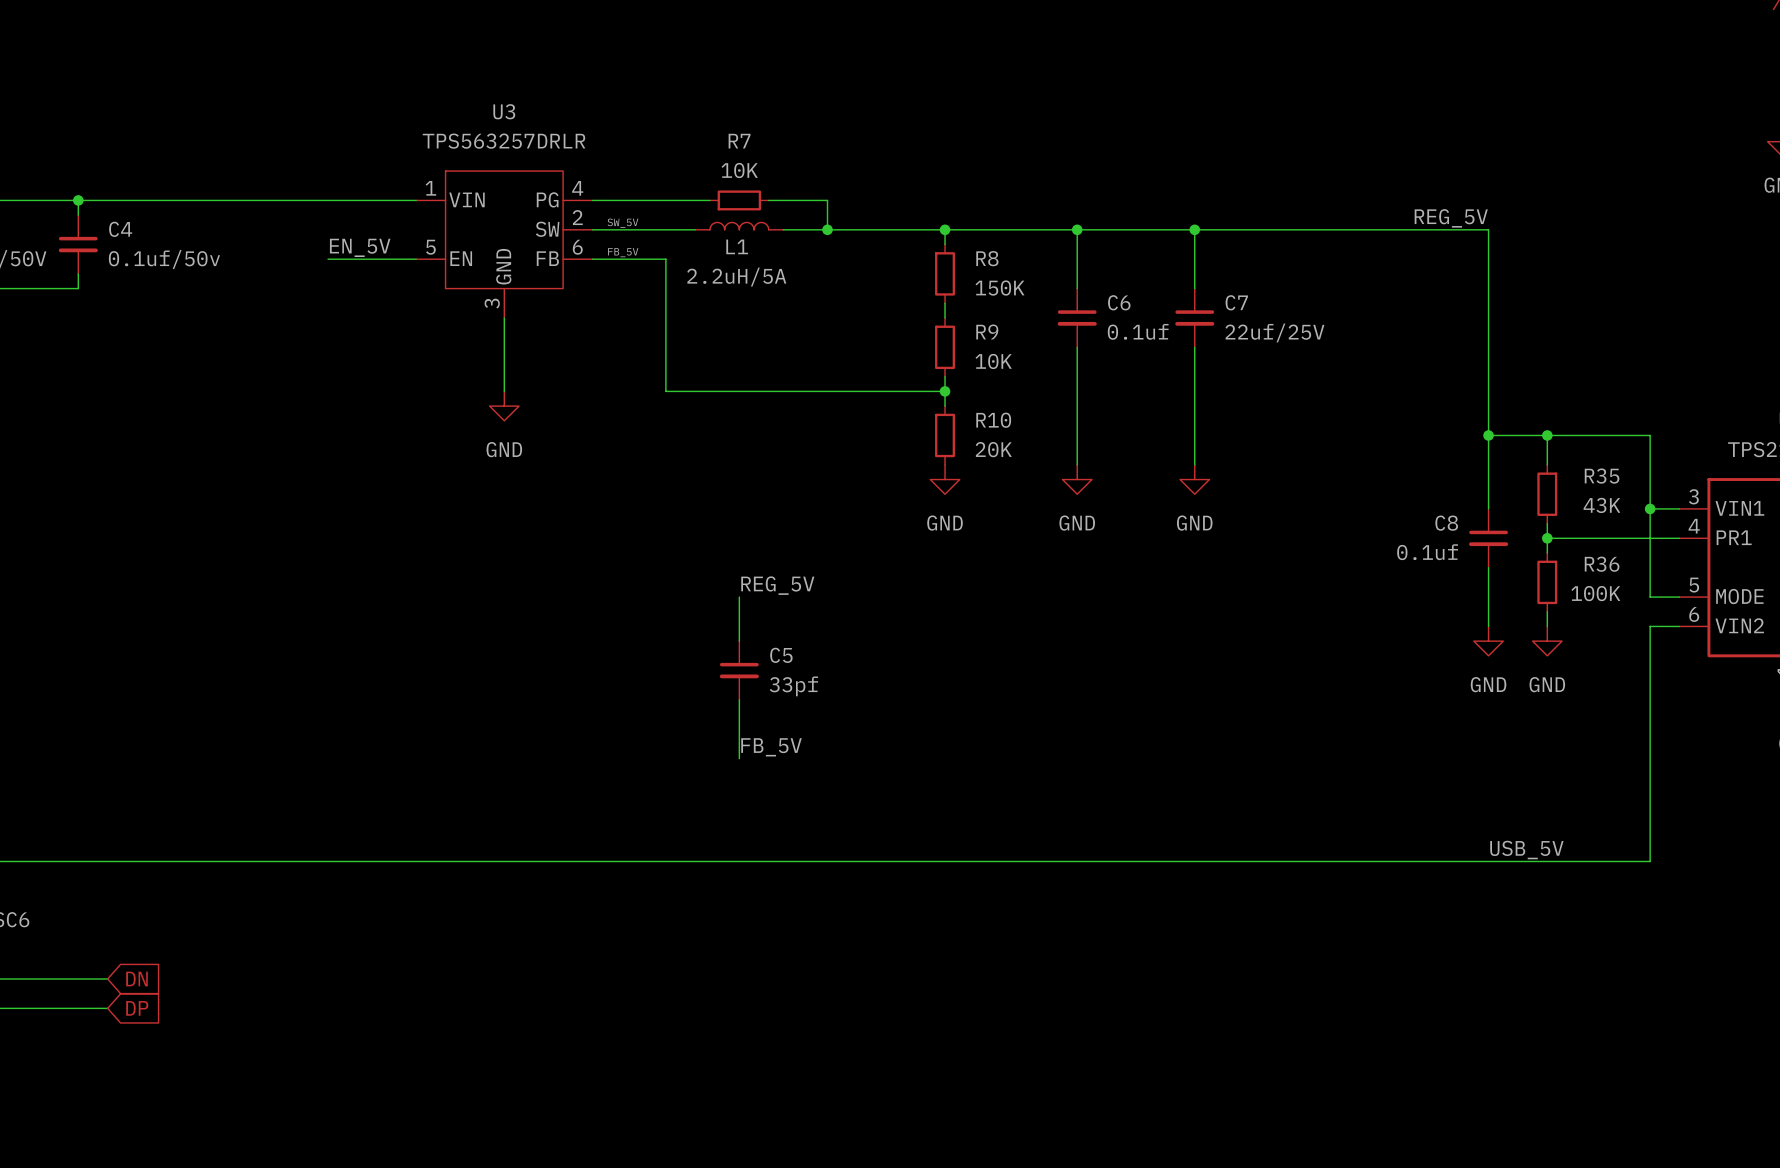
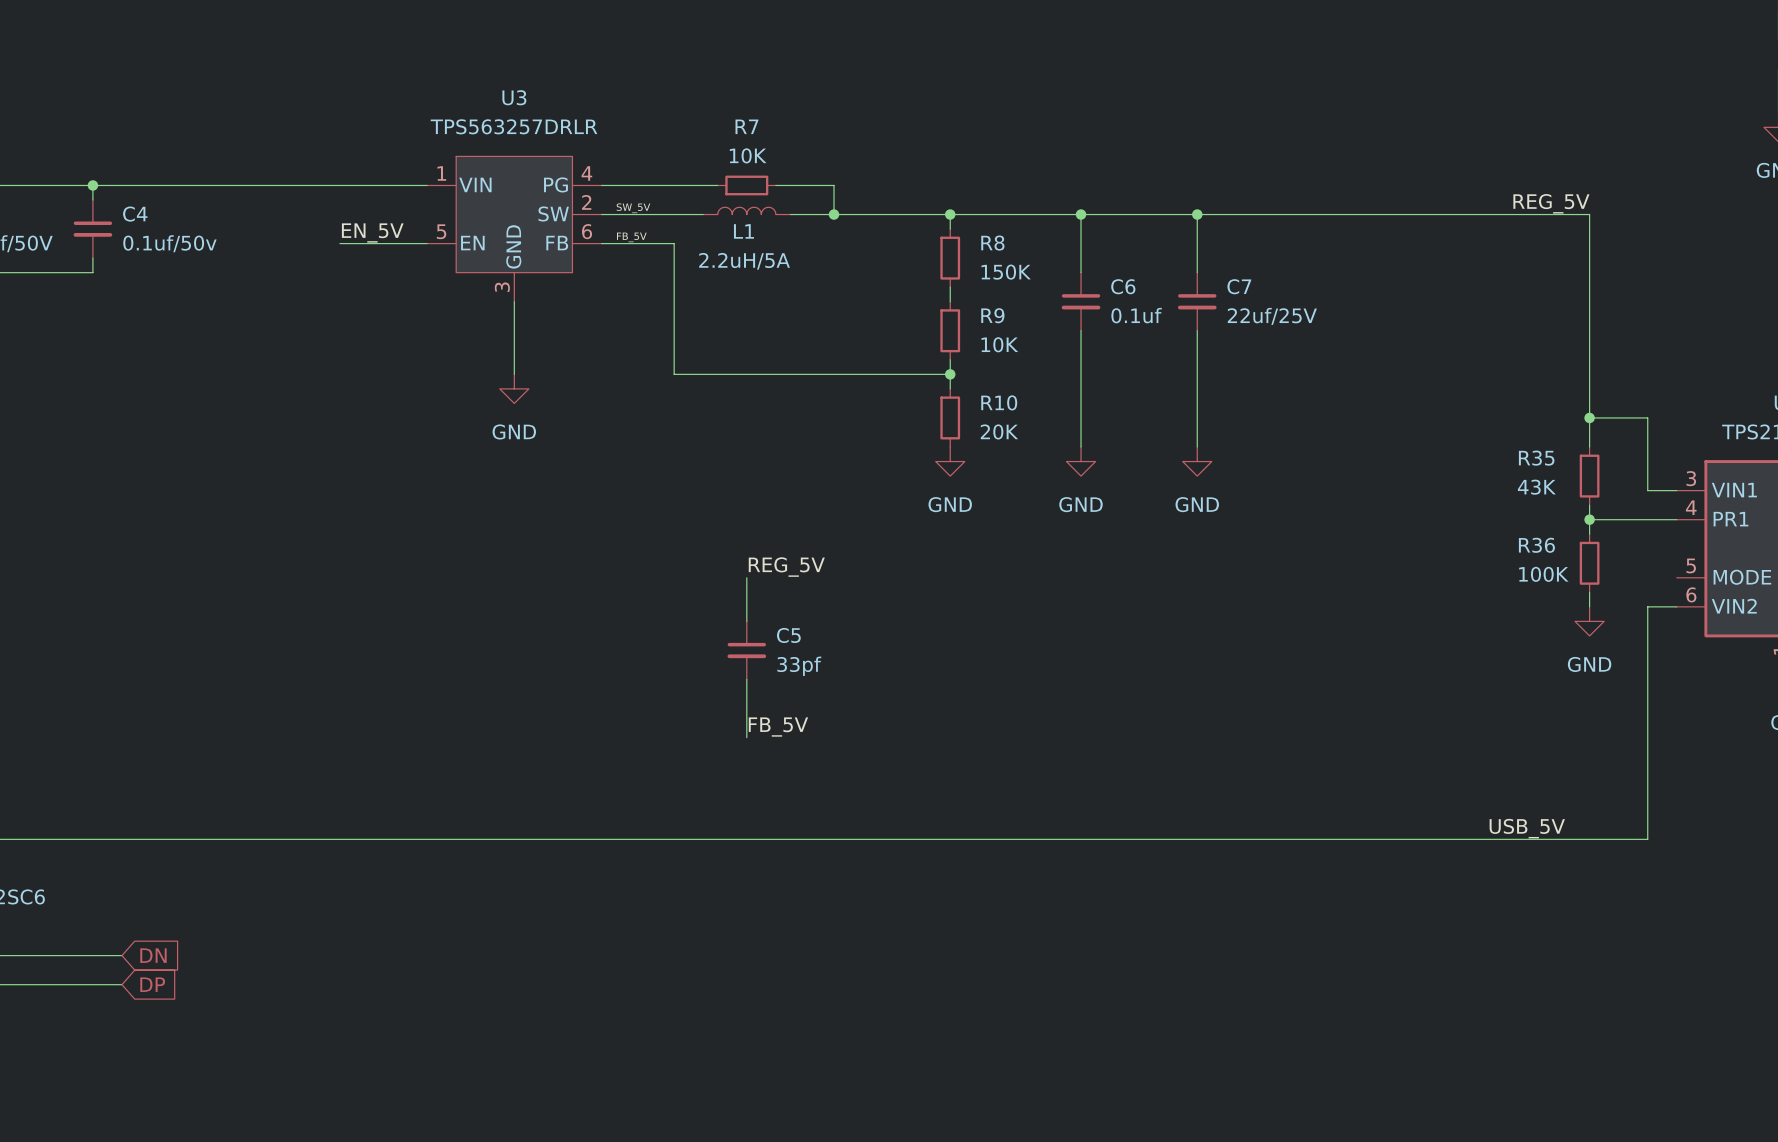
label position: REG_5V (1451, 218) -> REG_5V (1551, 203)
wire: (1488, 229) (1488, 508) -> (1487, 214) (1589, 214) (1589, 447)
wire: (1488, 435) (1591, 435) -> none
junction: (1488, 435) -> none
wire: (1547, 435) (1547, 464) -> none
junction position: (1547, 435) -> (1589, 417)
R35 name position: R35 (1602, 476) -> R35 (1536, 458)
R35 position: (1547, 494) -> (1589, 476)
R35 value position: 43K (1601, 505) -> 43K (1536, 487)
wire: (1650, 508) (1650, 597) (1679, 597) -> none
junction: (1650, 508) -> none
wire: (1547, 523) (1547, 553) -> (1589, 505) (1589, 534)
C8: 0.1uf (1488, 538) -> none
wire: (1547, 538) (1591, 538) -> none
junction: (1547, 538) -> none
junction: none -> (1589, 519)
R36 name position: R36 (1602, 564) -> R36 (1536, 545)
wire: (1488, 567) (1488, 626) -> none
R36 position: (1547, 582) -> (1589, 563)
R36 value position: 100K (1595, 593) -> 100K (1543, 574)
wire: (1547, 611) (1547, 626) -> (1589, 592) (1589, 606)
power symbol: GND (1488, 641) -> none
power symbol position: GND (1547, 641) -> GND (1589, 621)

